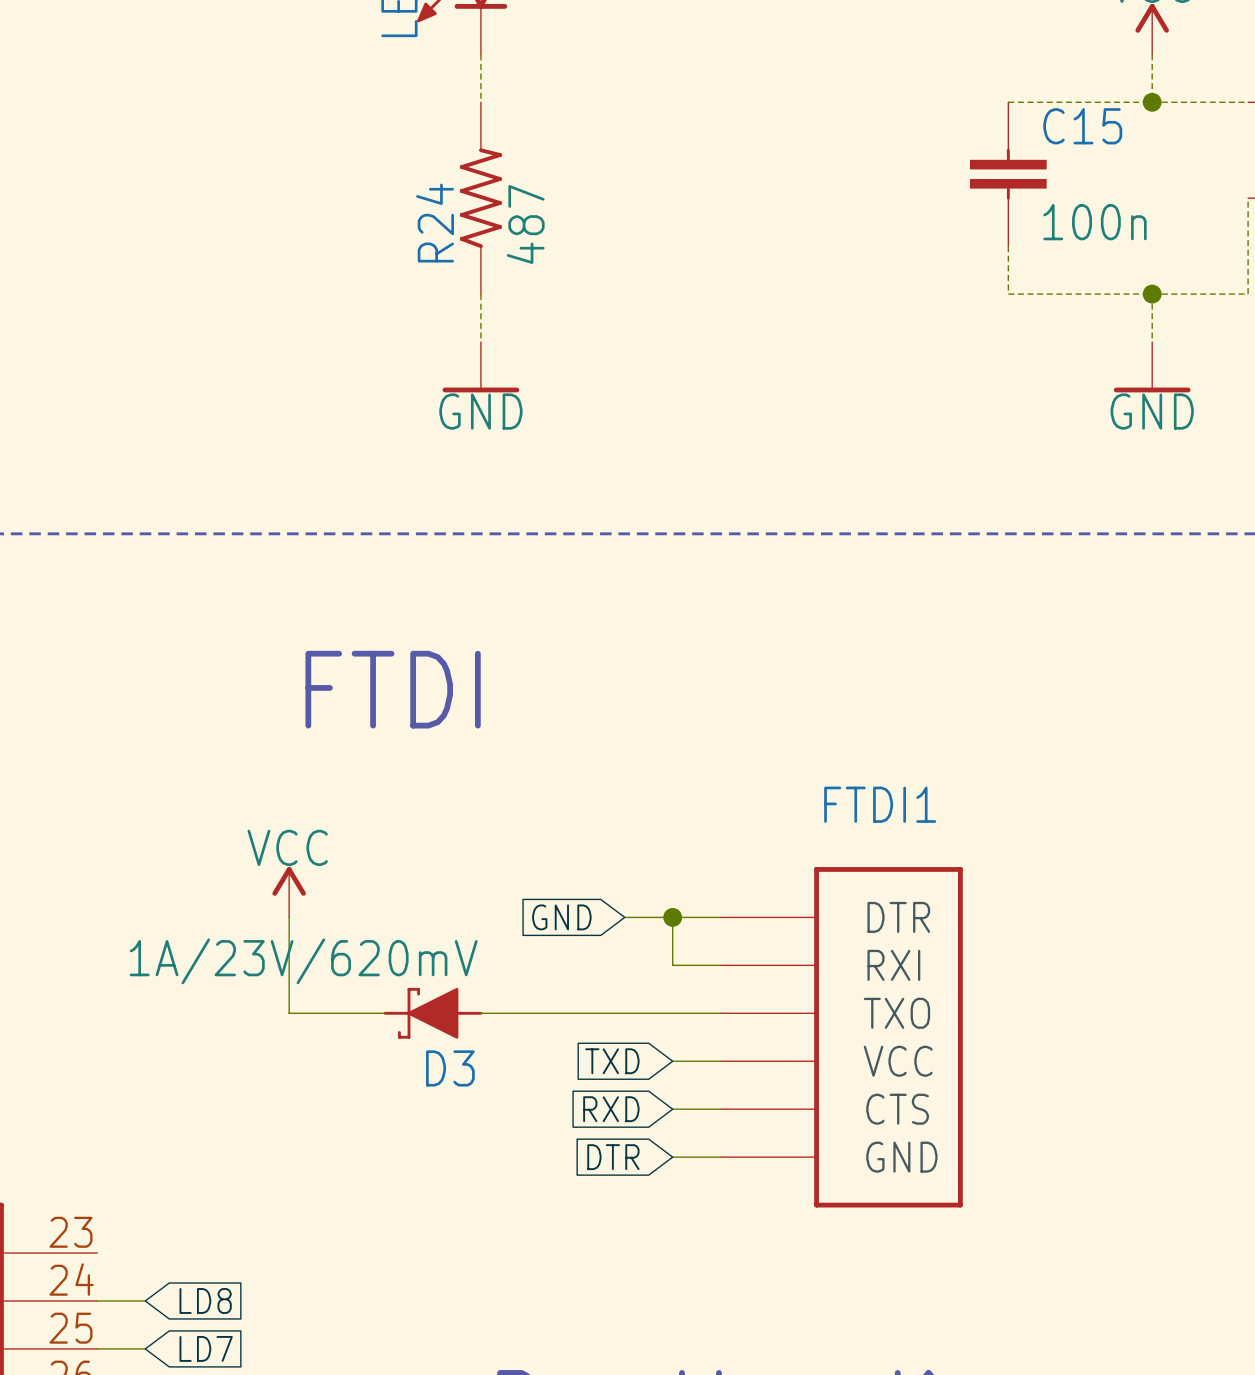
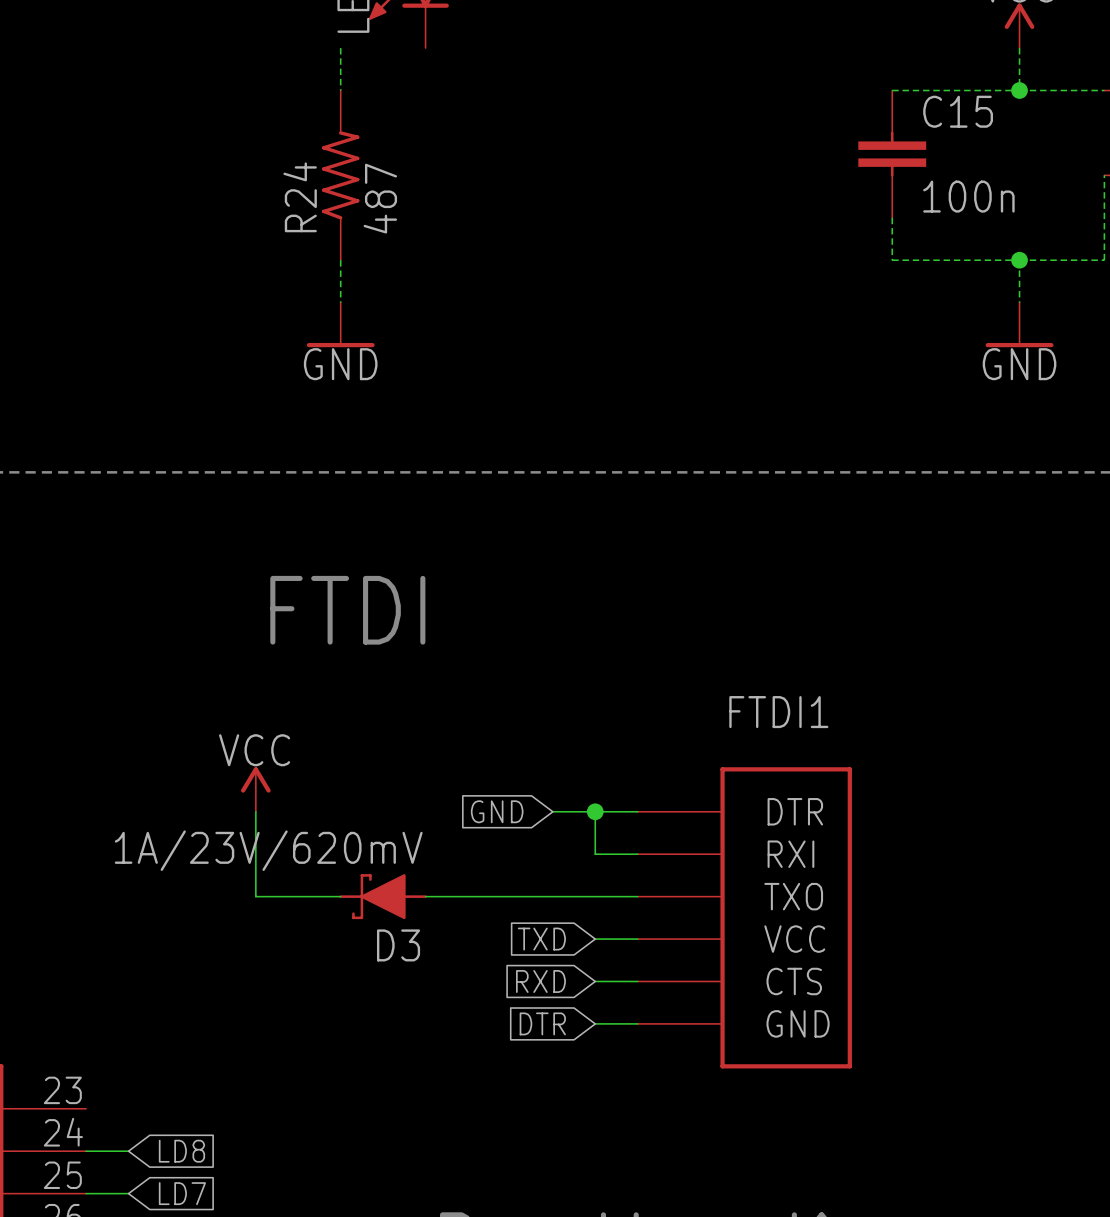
wire: (480, 54) (480, 102) -> (340, 48) (340, 90)
R24 position: (480, 198) -> (340, 175)
wire: (480, 294) (480, 342) -> (340, 260) (340, 302)
power symbol position: GND (480, 367) -> GND (340, 324)

